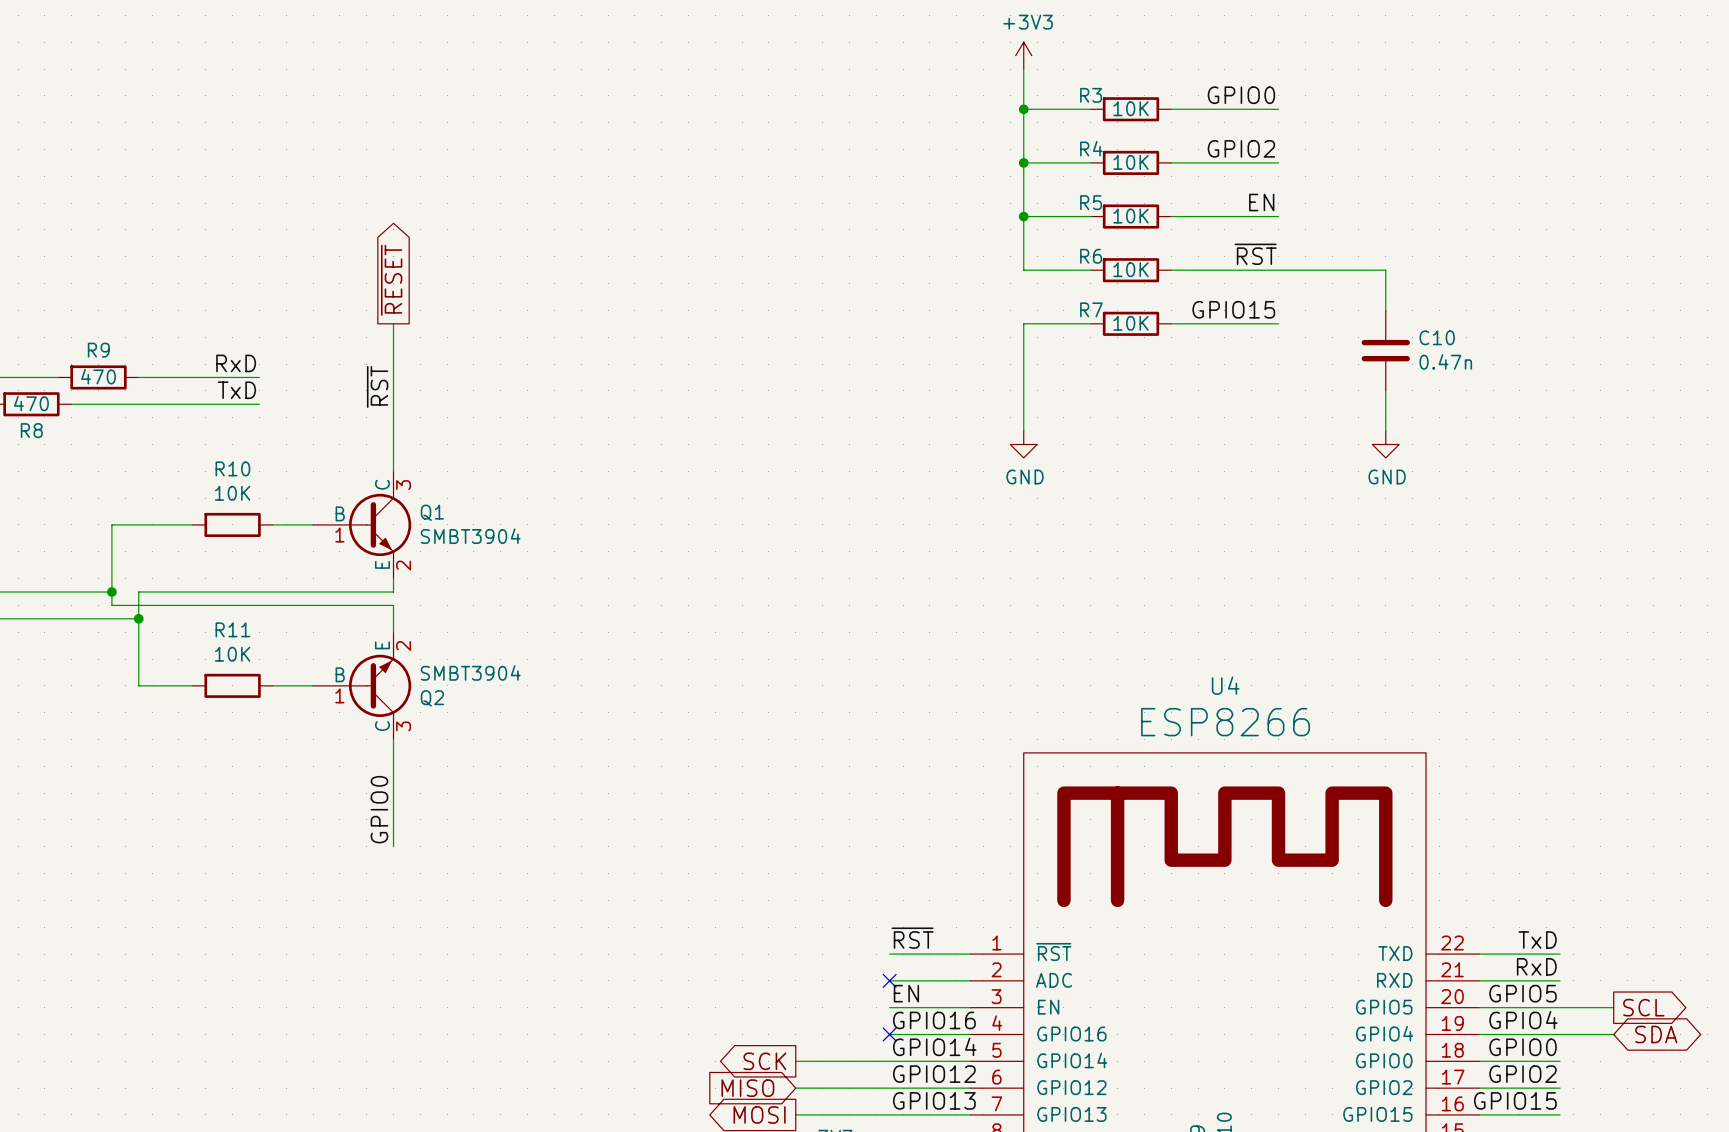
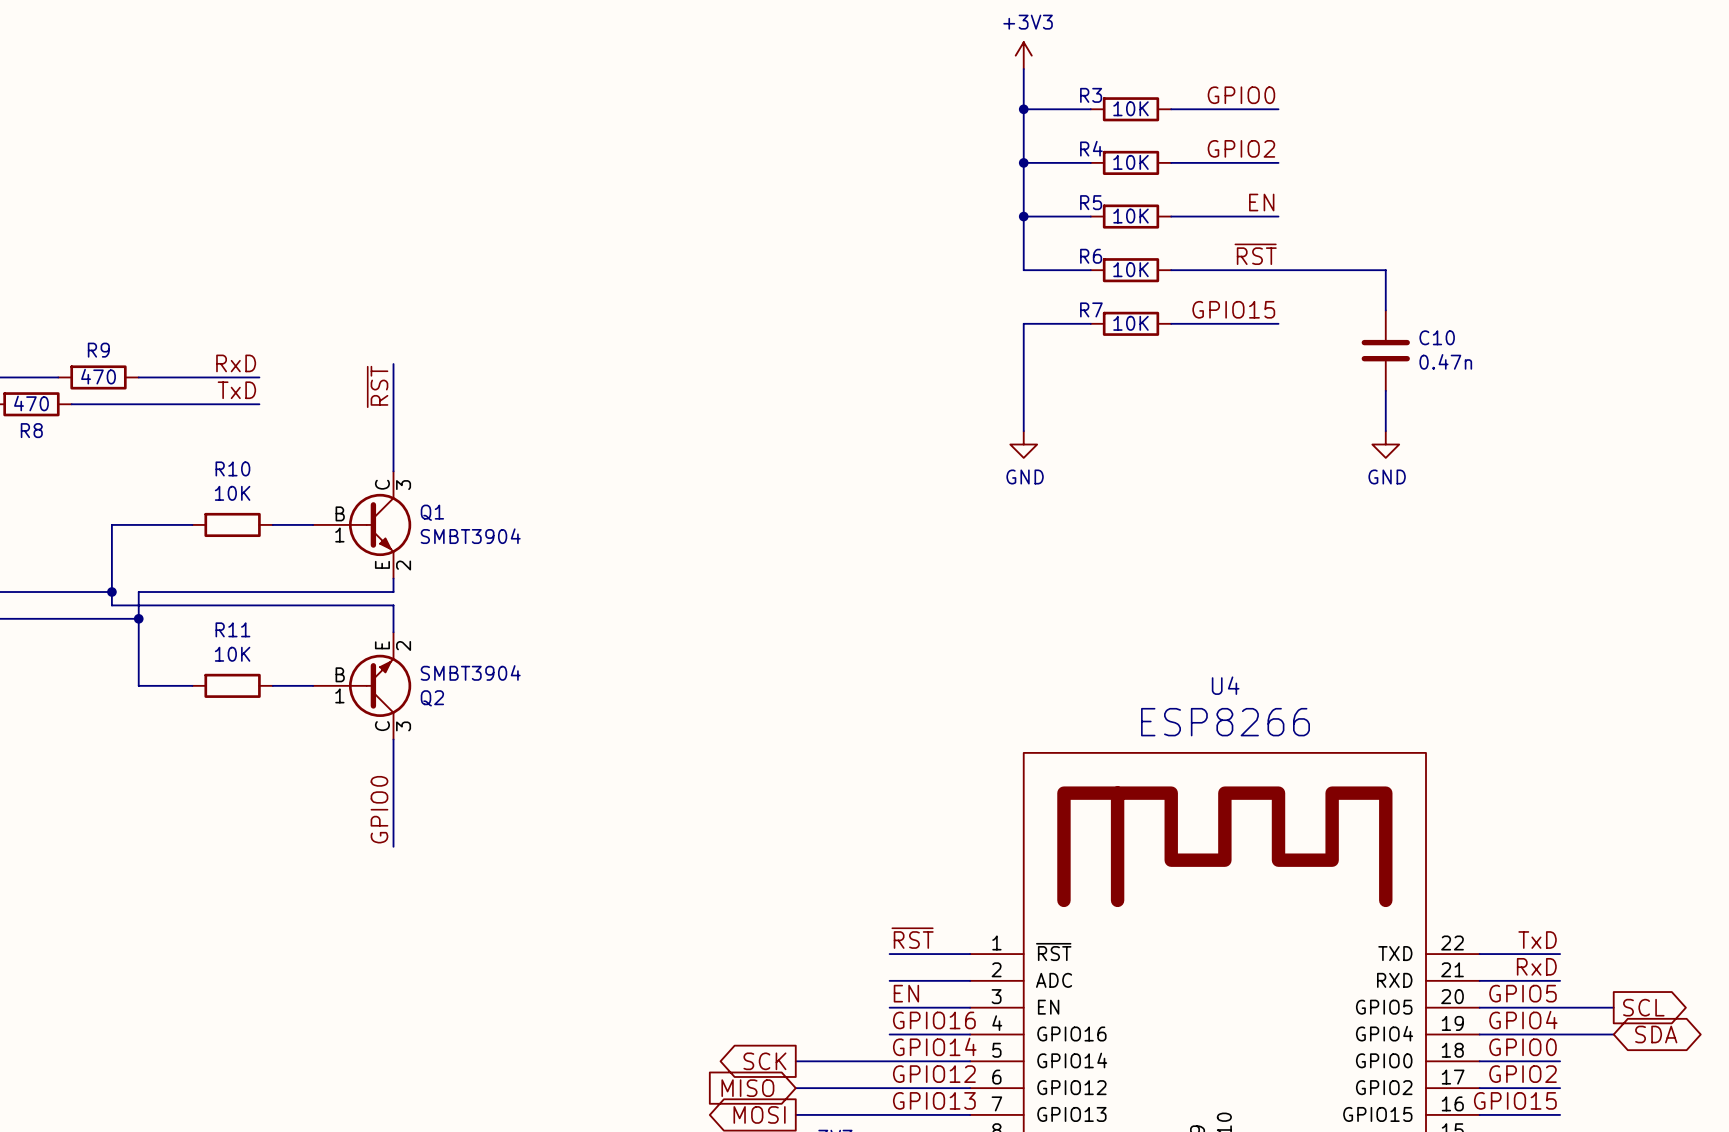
global label: ~{RESET} (391, 280) -> none
wire: (393, 323) (393, 364) -> none
no-connect mark: (889, 980) -> none
no-connect mark: (889, 1034) -> none

